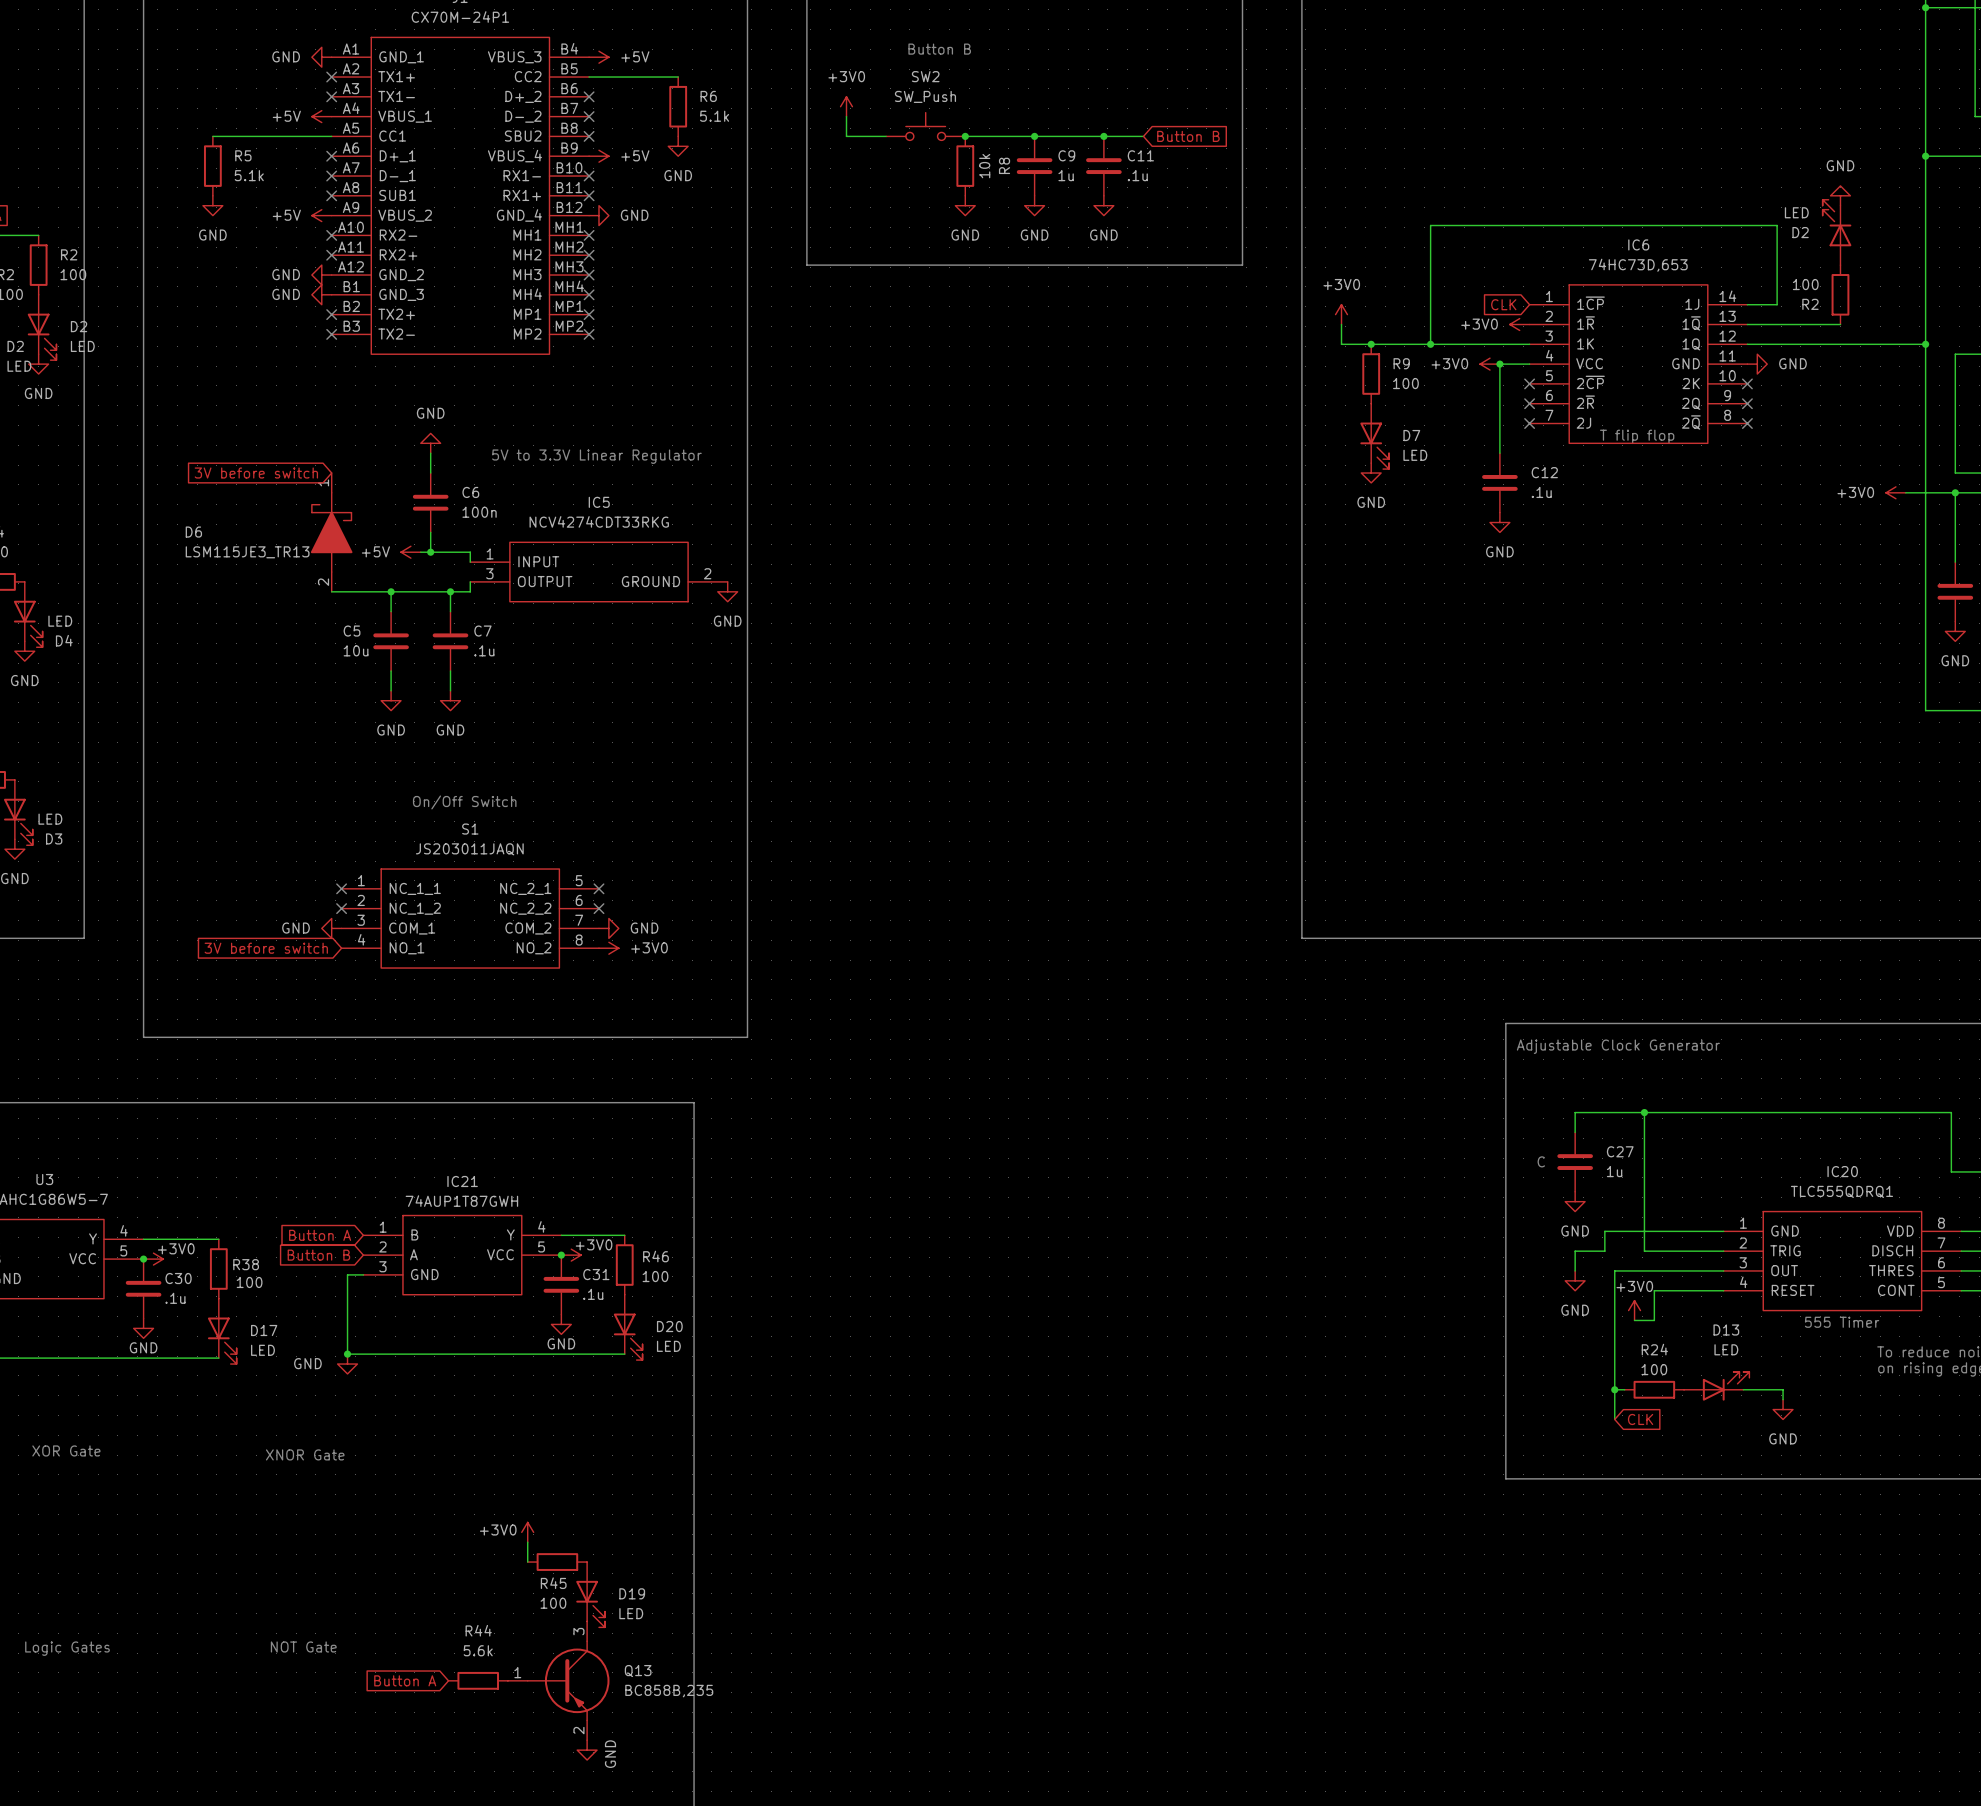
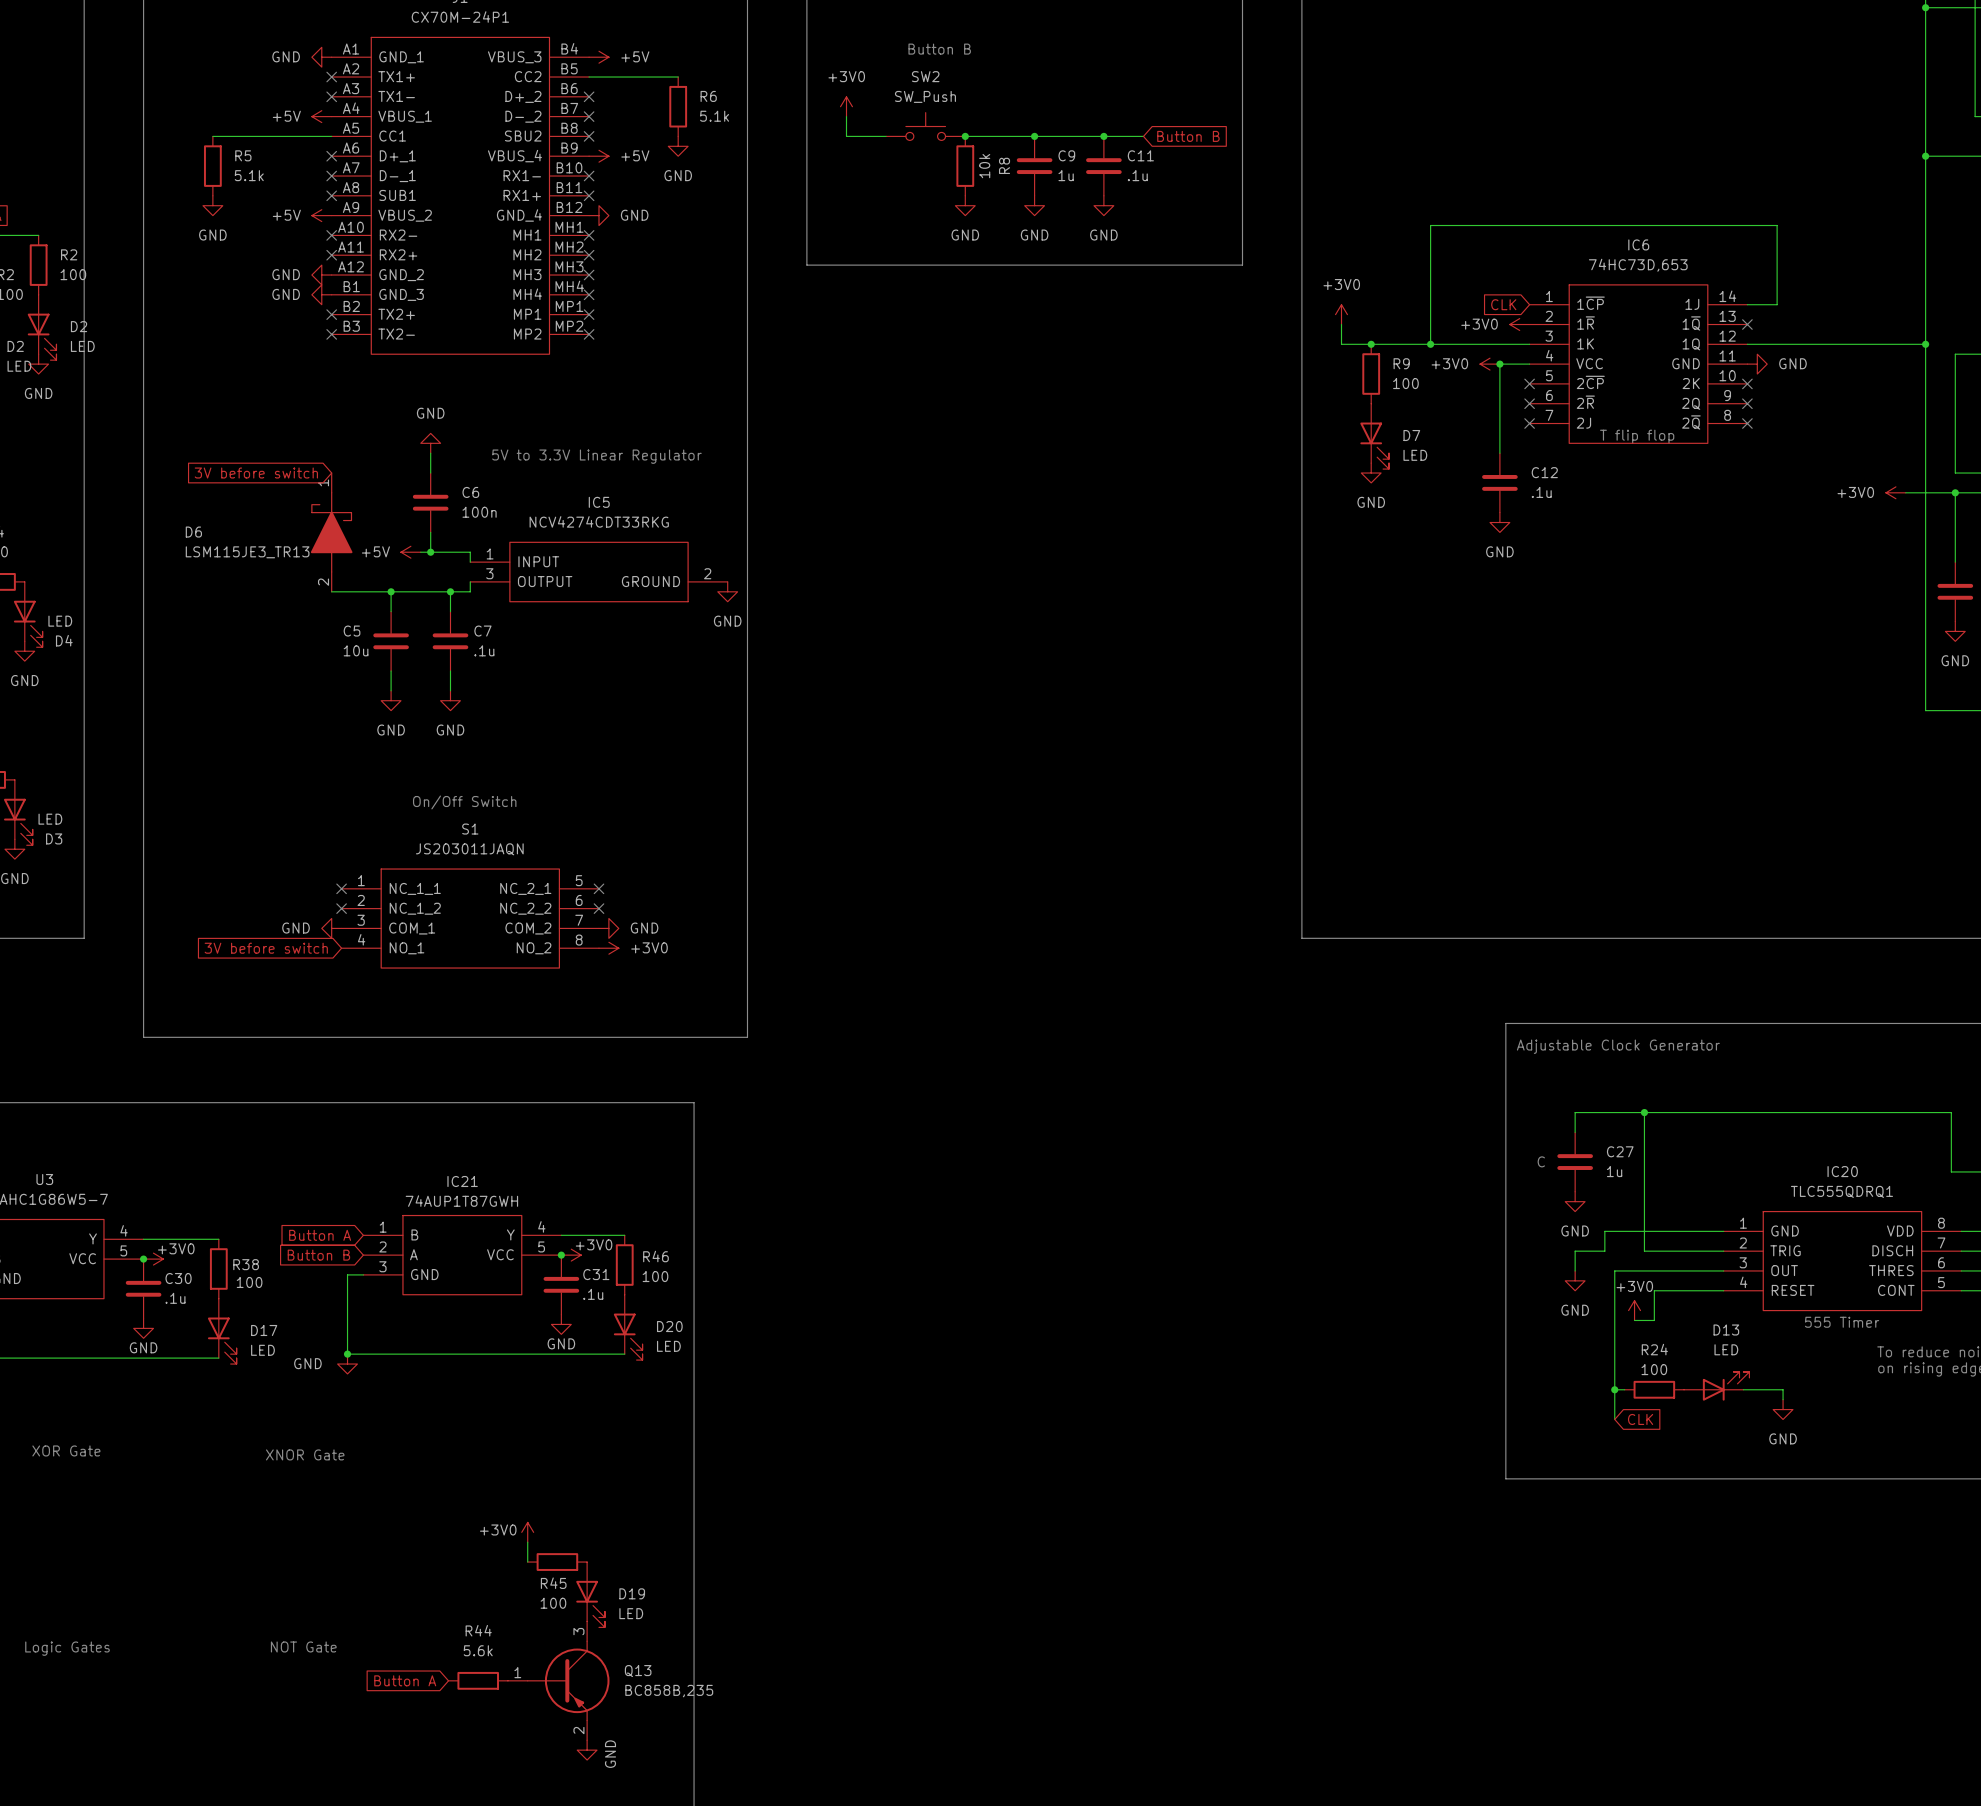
power symbol: GND (1840, 195) -> none
D2: LED (1837, 232) -> none
R2: 100 (1840, 294) -> none
wire: (1747, 324) (1840, 324) -> none
no-connect mark: none -> (1747, 324)

